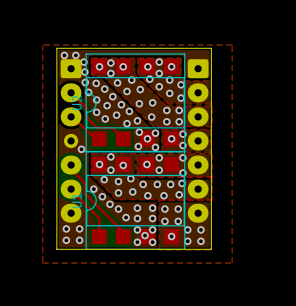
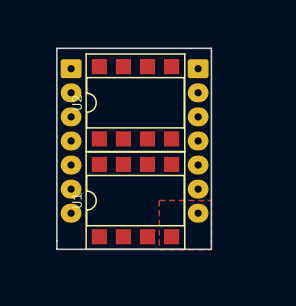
top zone outline: (42, 45) (232, 45) (232, 263) (42, 263) (42, 45) -> none
via: (64, 55) -> none
via: (75, 55) -> none
top zone outline: (91, 58) (134, 58) (134, 74) (166, 106) (210, 106) (212, 126) (153, 126) (103, 76) (93, 76) (91, 74) (91, 58) -> none
top zone outline: (137, 58) (181, 58) (181, 78) (183, 81) (211, 81) (211, 103) (168, 103) (137, 73) (137, 58) -> none
part footprint: [60, 59, 82, 223] -> [60, 59, 82, 223]
via: (83, 62) -> none
via: (159, 62) -> none
via: (110, 63) -> none
via: (99, 66) -> none
via: (123, 66) -> none
via: (147, 66) -> none
via: (171, 66) -> none
via: (84, 72) -> none
via: (110, 73) -> none
via: (159, 73) -> none
via: (149, 79) -> none
via: (131, 80) -> none
via: (169, 80) -> none
via: (85, 82) -> none
via: (117, 82) -> none
via: (96, 83) -> none
via: (181, 84) -> none
via: (159, 86) -> none
via: (104, 89) -> none
via: (140, 89) -> none
via: (127, 91) -> none
top track: (71, 92) (86, 107) (86, 117) (97, 127) (112, 127) (123, 138) -> none
via: (88, 92) -> none
via: (169, 93) -> none
via: (112, 96) -> none
via: (181, 98) -> none
via: (96, 100) -> none
via: (152, 102) -> none
via: (139, 103) -> none
via: (121, 104) -> none
via: (107, 105) -> none
via: (166, 110) -> none
via: (179, 110) -> none
via: (129, 111) -> none
via: (96, 112) -> none
via: (116, 115) -> none
top track: (71, 116) (94, 138) (99, 138) -> none
via: (151, 117) -> none
via: (105, 118) -> none
via: (137, 120) -> none
via: (166, 121) -> none
via: (179, 121) -> none
via: (127, 123) -> none
top zone outline: (162, 129) (210, 129) (210, 152) (162, 152) (162, 129) -> none
via: (139, 132) -> none
via: (155, 133) -> none
via: (182, 134) -> none
via: (147, 138) -> none
via: (171, 138) -> none
via: (182, 145) -> none
via: (138, 146) -> none
via: (155, 147) -> none
via: (81, 149) -> none
via: (110, 156) -> none
via: (159, 157) -> none
via: (182, 157) -> none
via: (99, 164) -> none
via: (146, 164) -> none
top track: (71, 165) (71, 169) (84, 182) (84, 193) (123, 231) (123, 236) -> none
via: (123, 165) -> none
via: (110, 170) -> none
via: (159, 170) -> none
via: (182, 173) -> none
top zone outline: (141, 176) (137, 173) (137, 155) (139, 154) (212, 154) (212, 199) (116, 199) (91, 174) (91, 153) (135, 153) (136, 173) (138, 176) (212, 176) -> none
via: (130, 178) -> none
via: (104, 179) -> none
via: (118, 181) -> none
via: (182, 183) -> none
via: (143, 184) -> none
via: (157, 184) -> none
via: (170, 184) -> none
top track: (71, 189) (99, 218) (99, 236) -> none
via: (93, 189) -> none
via: (132, 191) -> none
via: (118, 192) -> none
via: (179, 194) -> none
via: (147, 195) -> none
via: (164, 195) -> none
via: (102, 196) -> none
via: (109, 204) -> none
via: (137, 208) -> none
via: (152, 208) -> none
via: (118, 209) -> none
via: (164, 209) -> none
via: (178, 209) -> none
via: (126, 217) -> none
via: (137, 218) -> none
via: (152, 218) -> none
via: (164, 221) -> none
via: (178, 221) -> none
via: (66, 228) -> none
via: (79, 228) -> none
via: (137, 229) -> none
via: (152, 229) -> none
via: (187, 229) -> none
via: (200, 229) -> none
via: (145, 235) -> none
via: (171, 236) -> none
via: (66, 240) -> none
via: (79, 240) -> none
via: (187, 241) -> none
via: (200, 241) -> none
via: (137, 242) -> none
via: (152, 242) -> none

